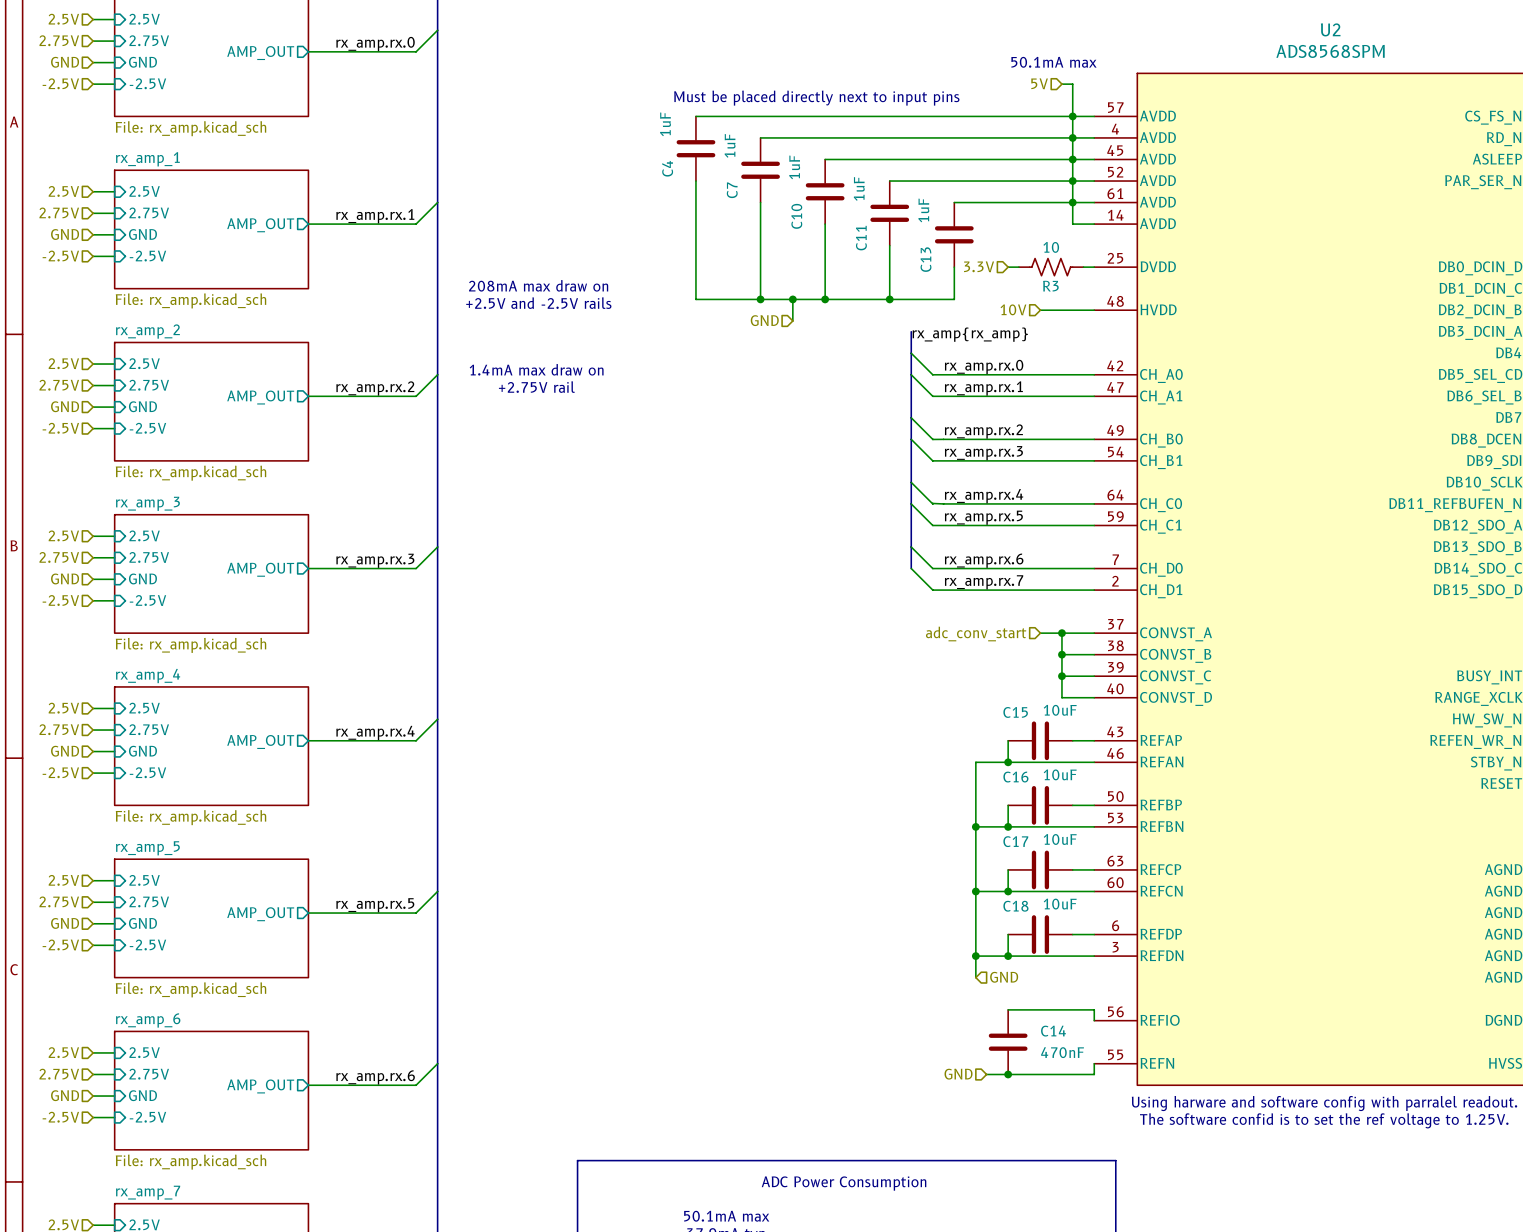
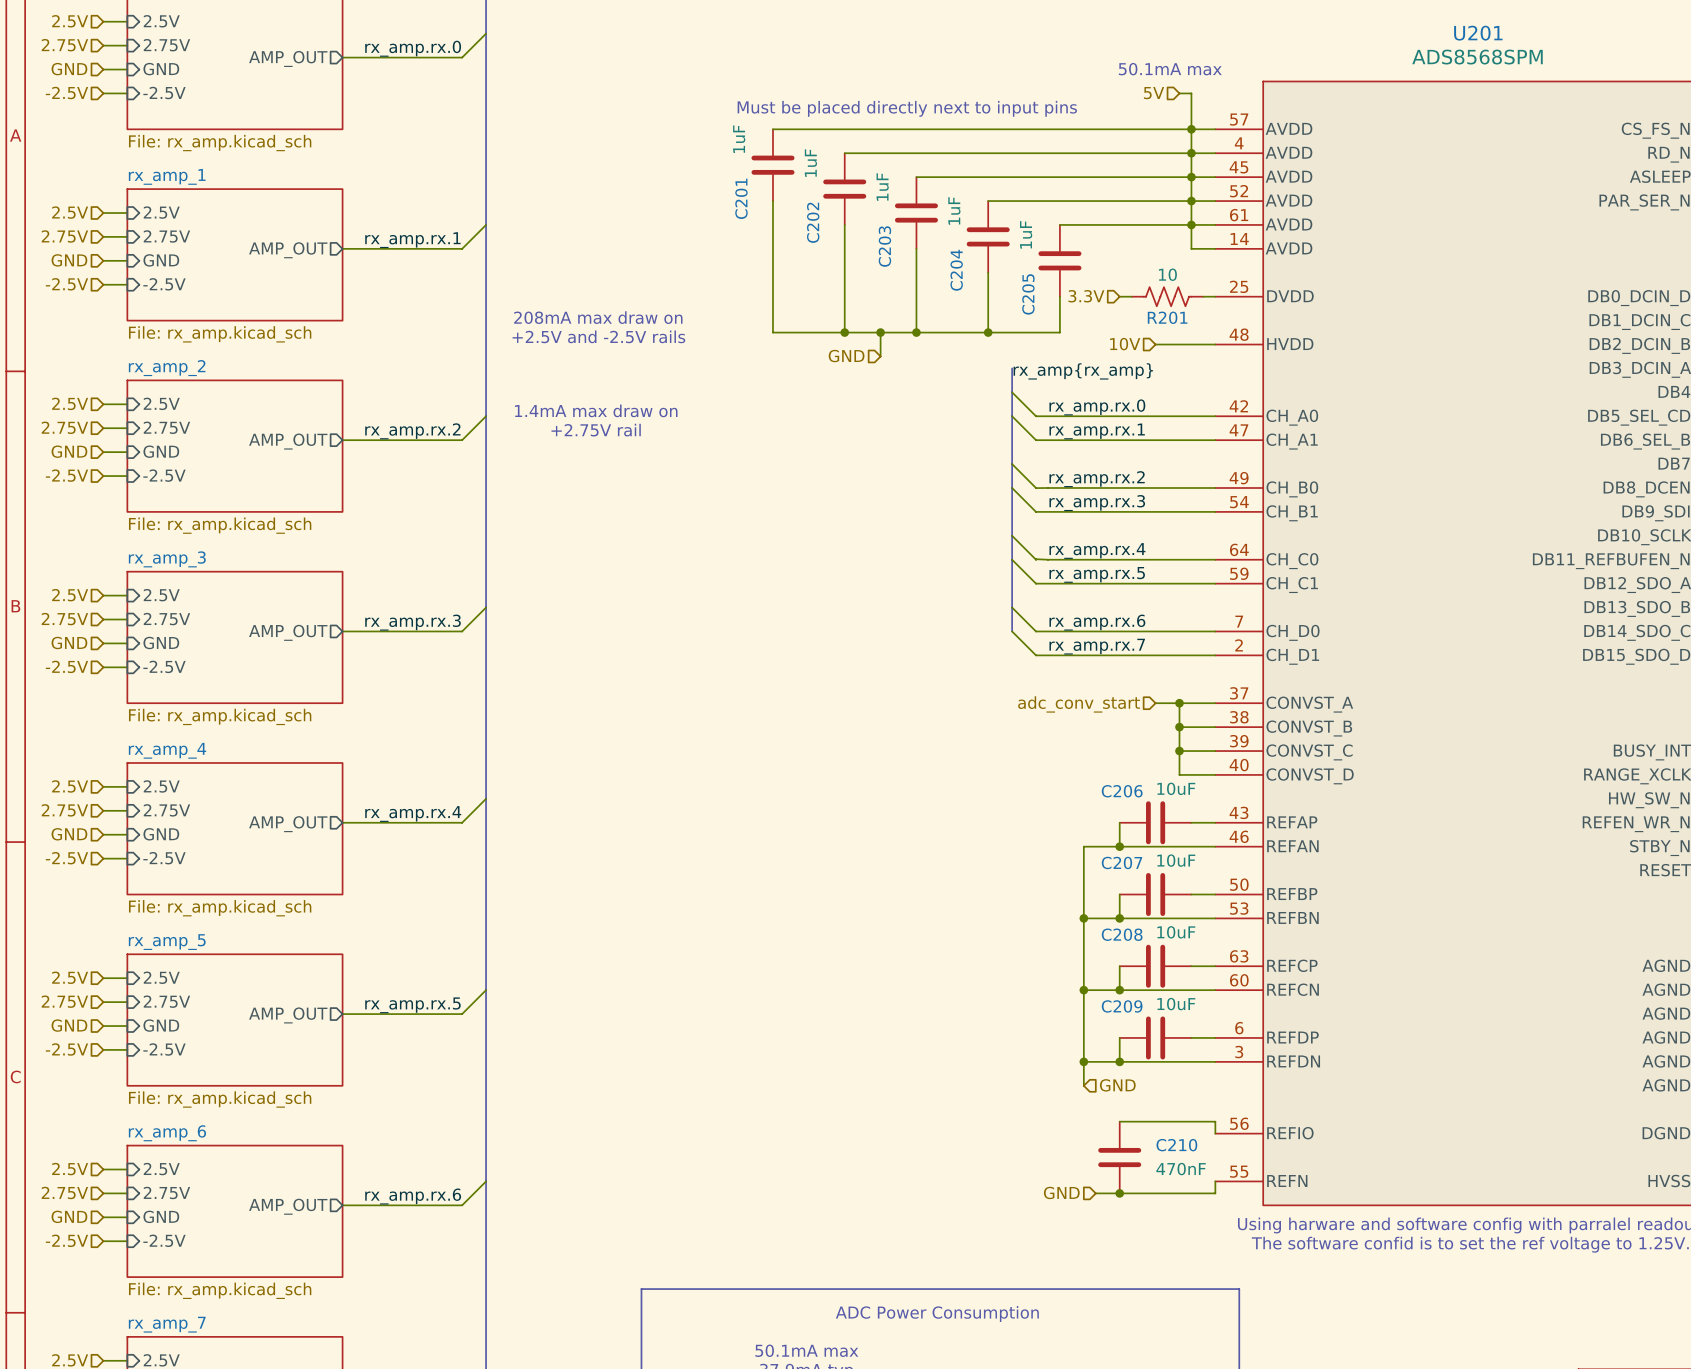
U2 name: U2 (1330, 29) -> U201 (1478, 33)
C4 name: C4 (667, 168) -> C201 (741, 198)
C7 name: C7 (732, 190) -> C202 (813, 222)
C10 name: C10 (796, 216) -> C203 (884, 246)
C11 name: C11 (861, 238) -> C204 (956, 270)
C13 name: C13 (925, 259) -> C205 (1028, 294)
R3 name: R3 (1050, 286) -> R201 (1167, 317)
C15 name: C15 (1015, 712) -> C206 (1122, 791)
C16 name: C16 (1015, 777) -> C207 (1122, 862)
C17 name: C17 (1015, 841) -> C208 (1122, 934)
C18 name: C18 (1015, 906) -> C209 (1122, 1006)
C14 name: C14 (1053, 1031) -> C210 (1176, 1145)

